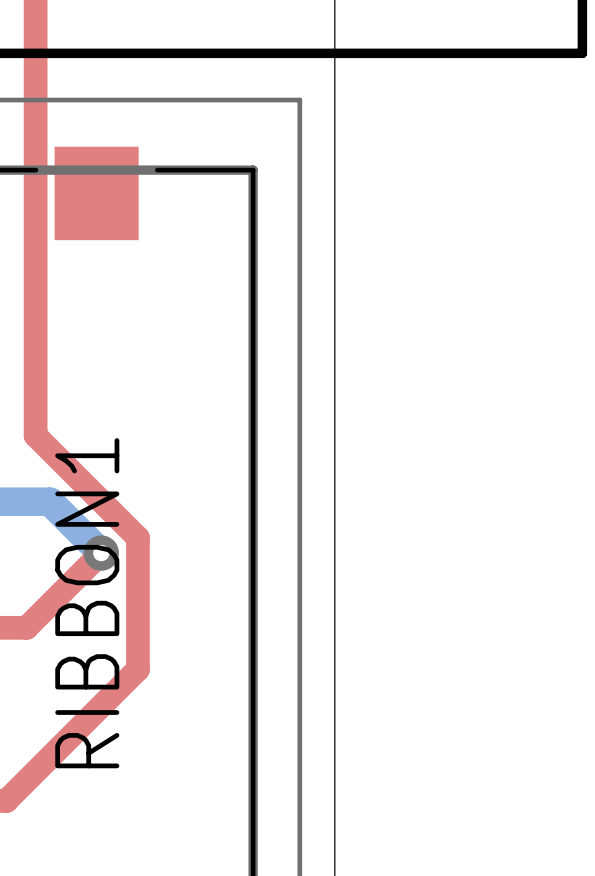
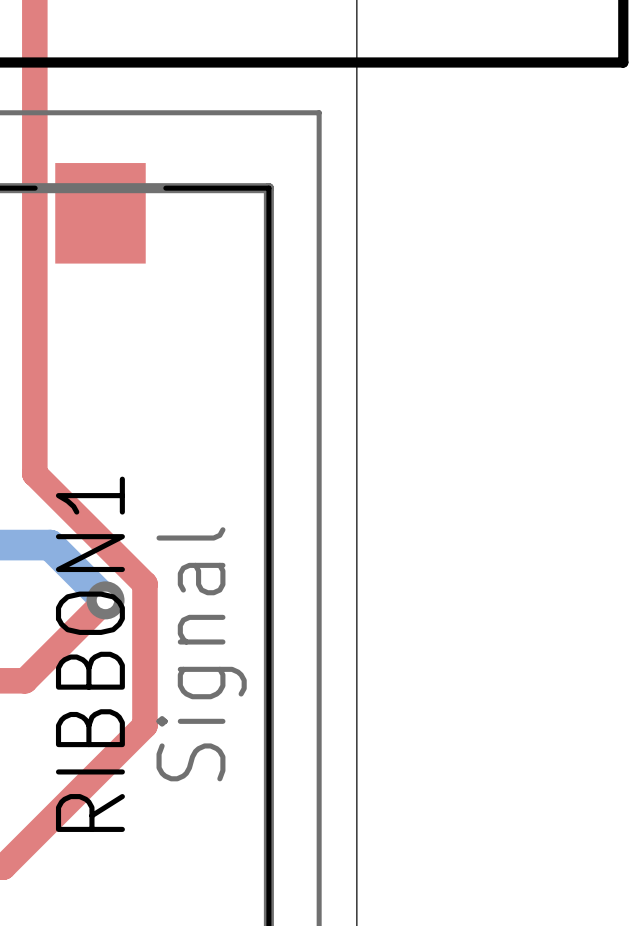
RIBBON1 value: none -> Signal (201, 654)

